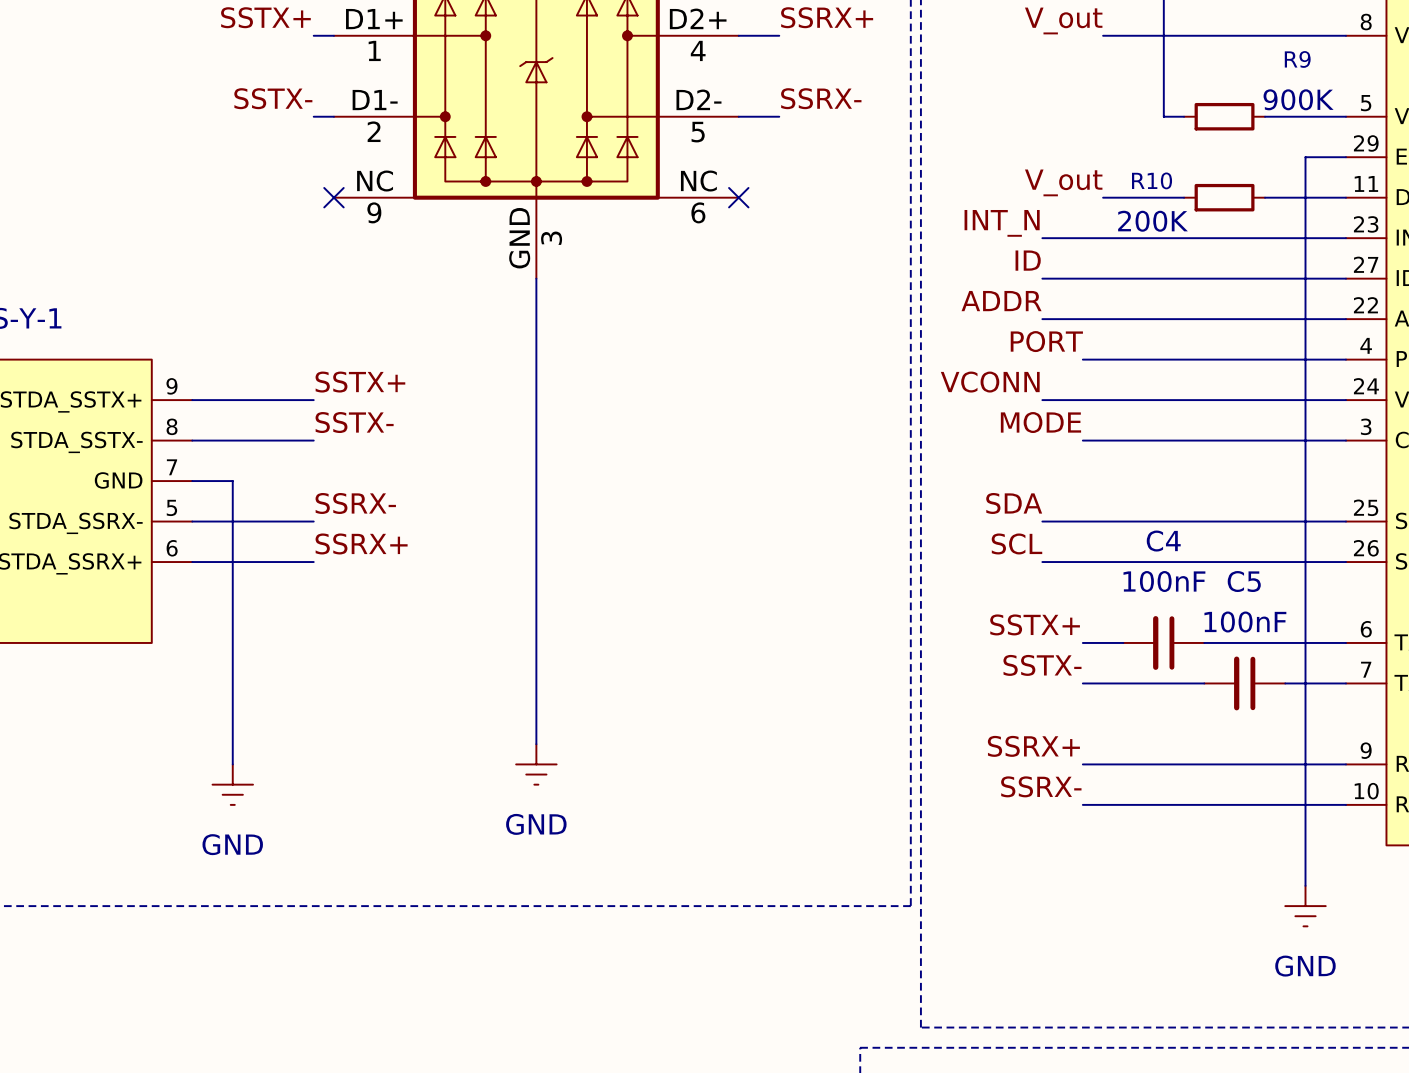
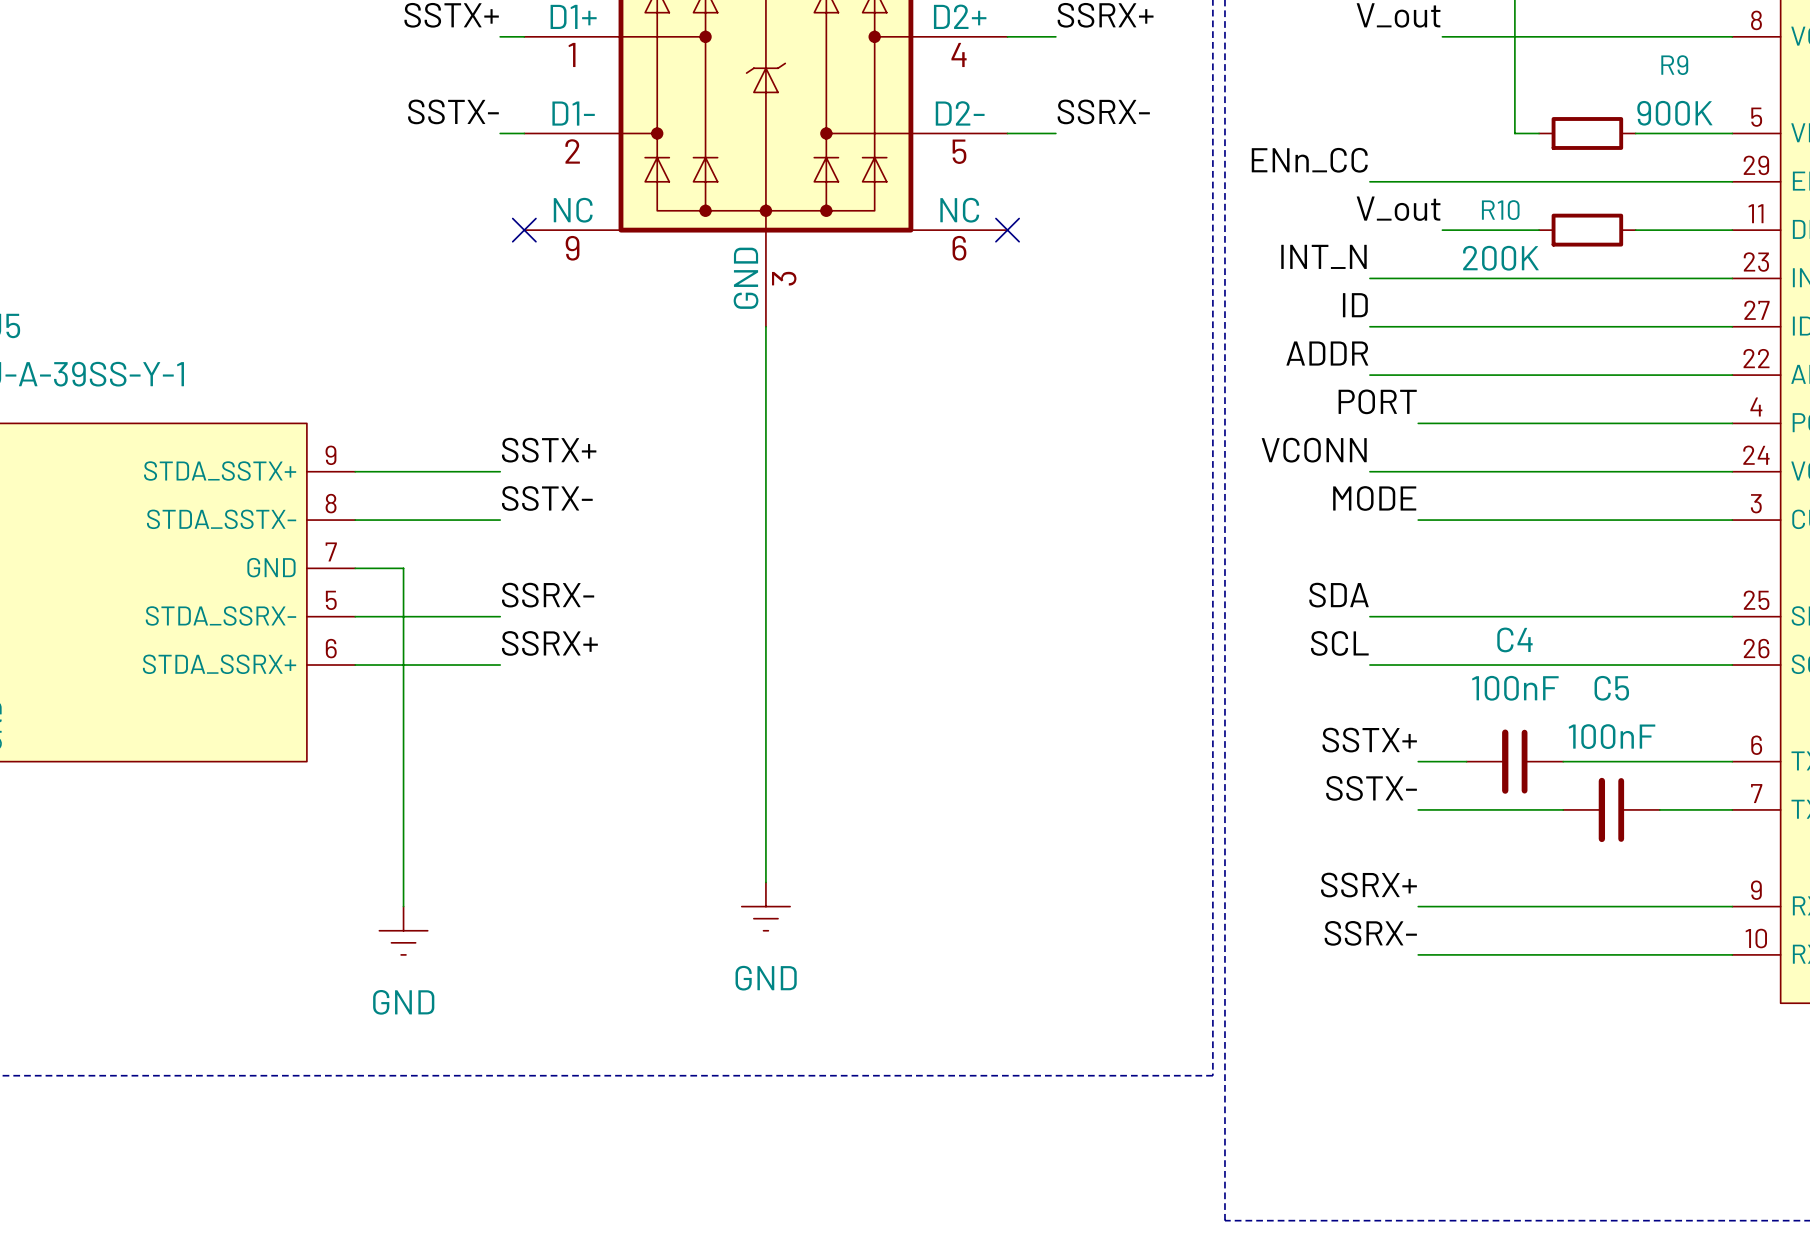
label: none -> ENn_CC (1309, 160)
wire: (1305, 157) (1305, 885) -> (1684, 181) (1369, 181)
power symbol: GND (1305, 906) -> none

